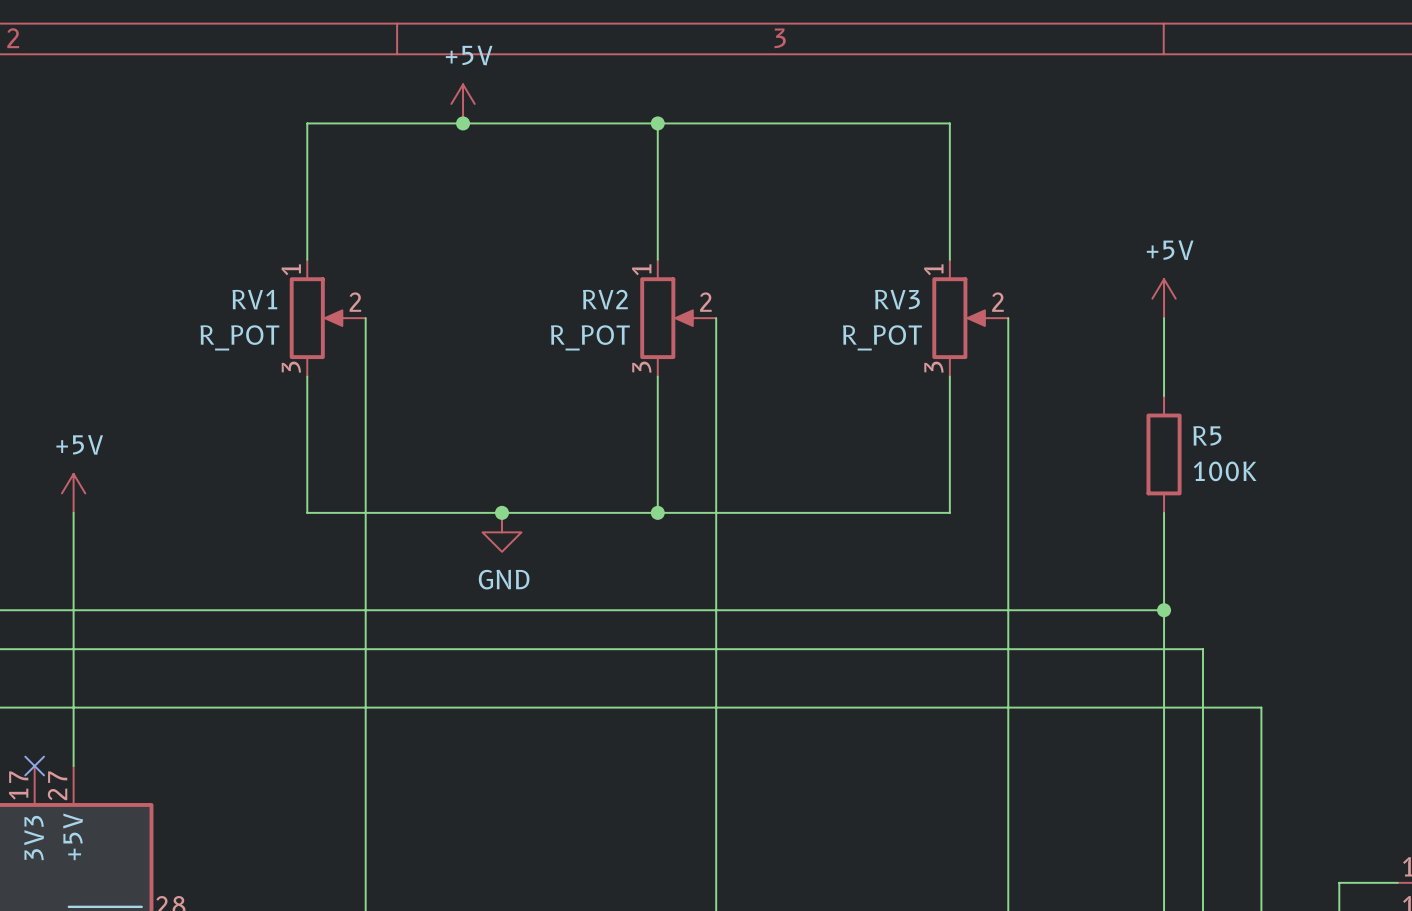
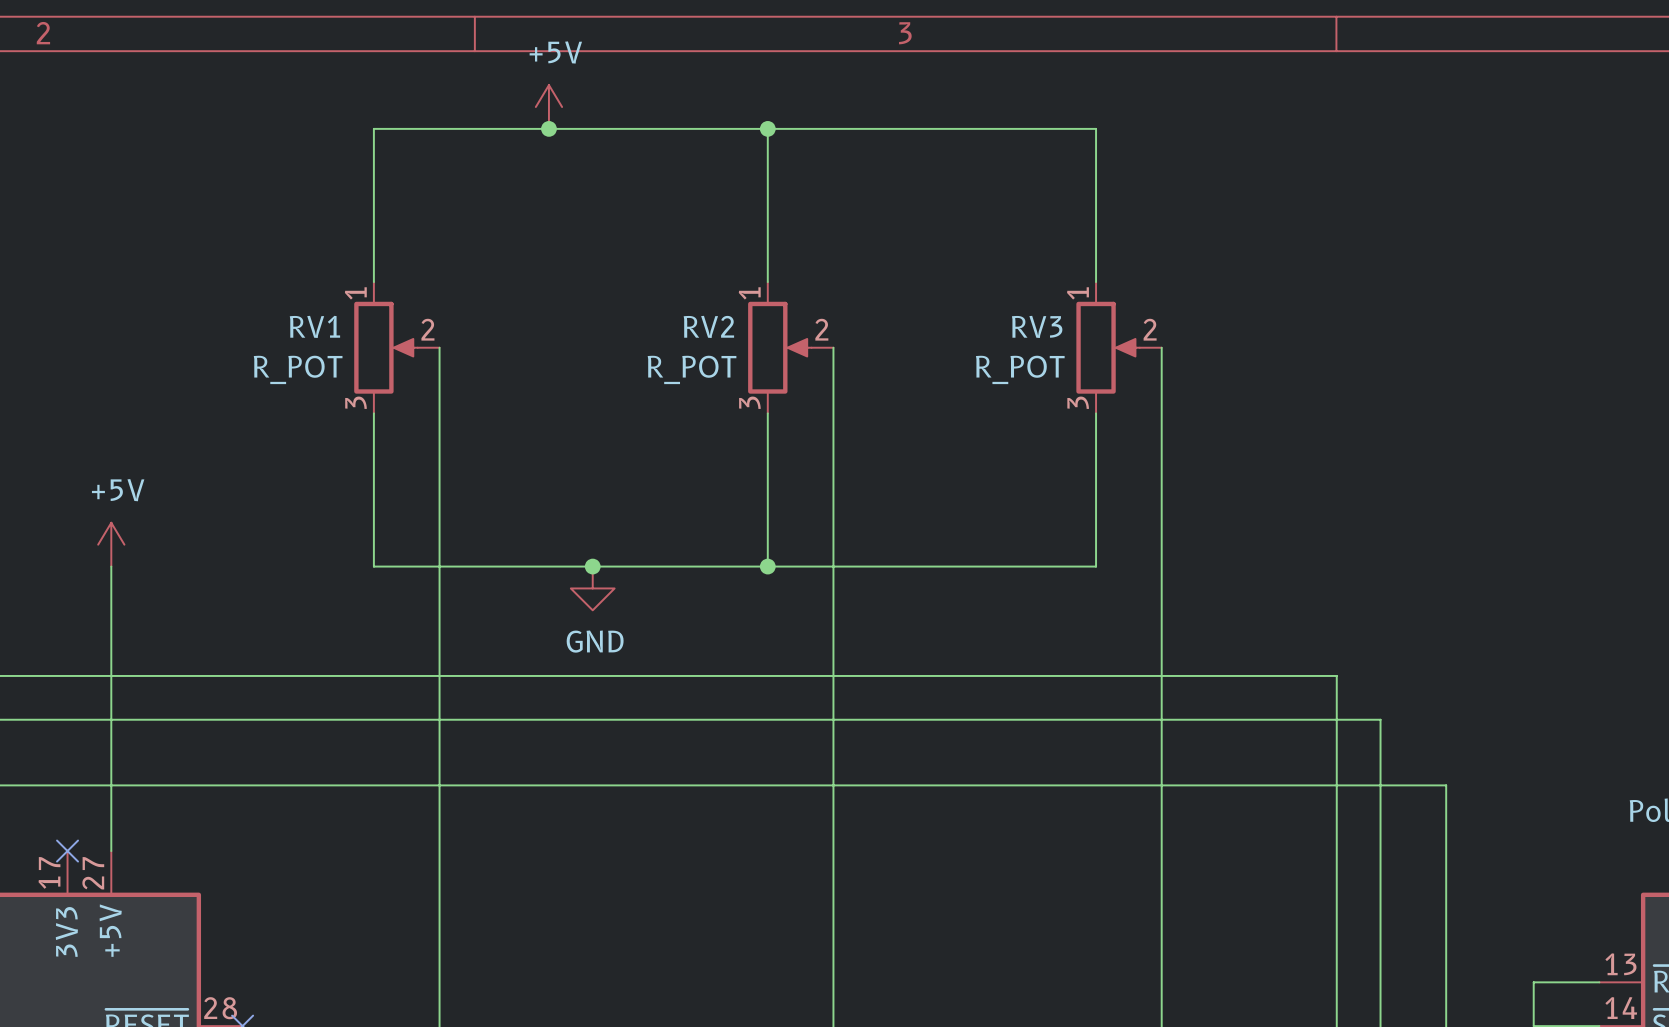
power symbol: +5V (1164, 298) -> none
wire: (1164, 318) (1164, 396) -> none
R5: 100K (1164, 454) -> none
wire: (1164, 512) (1164, 610) -> none
junction: (1164, 610) -> none

